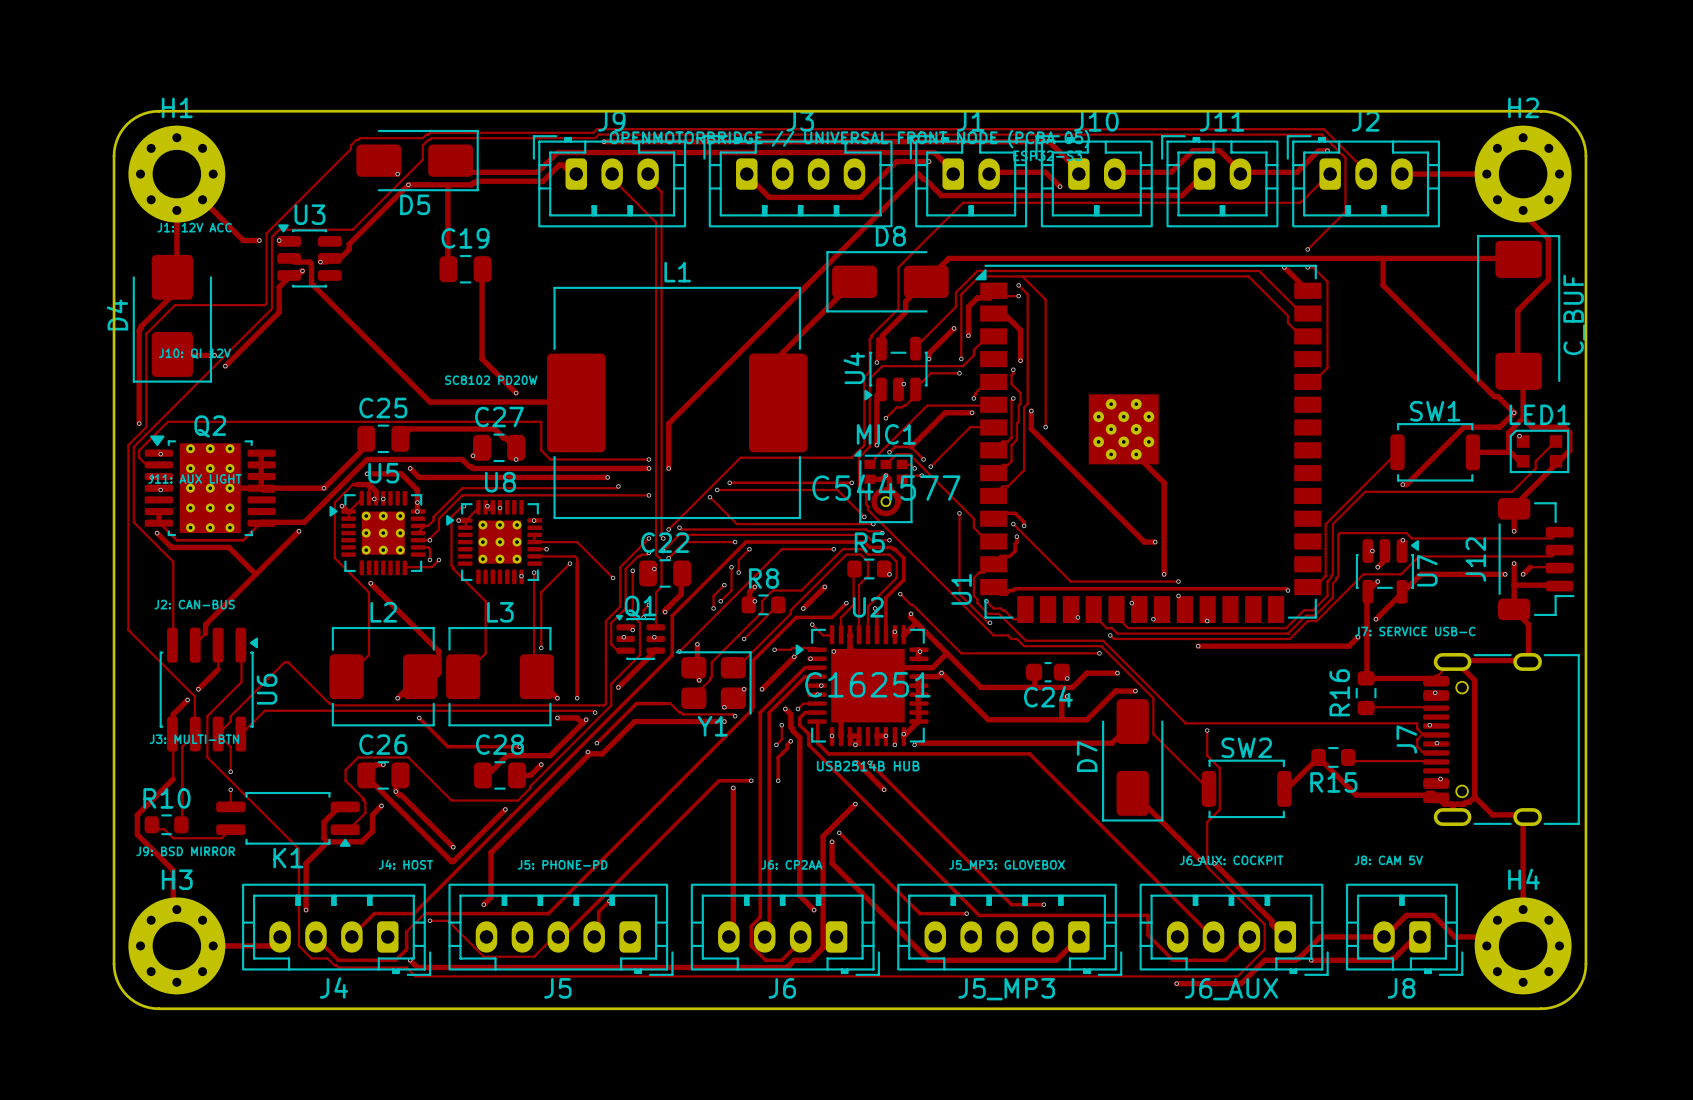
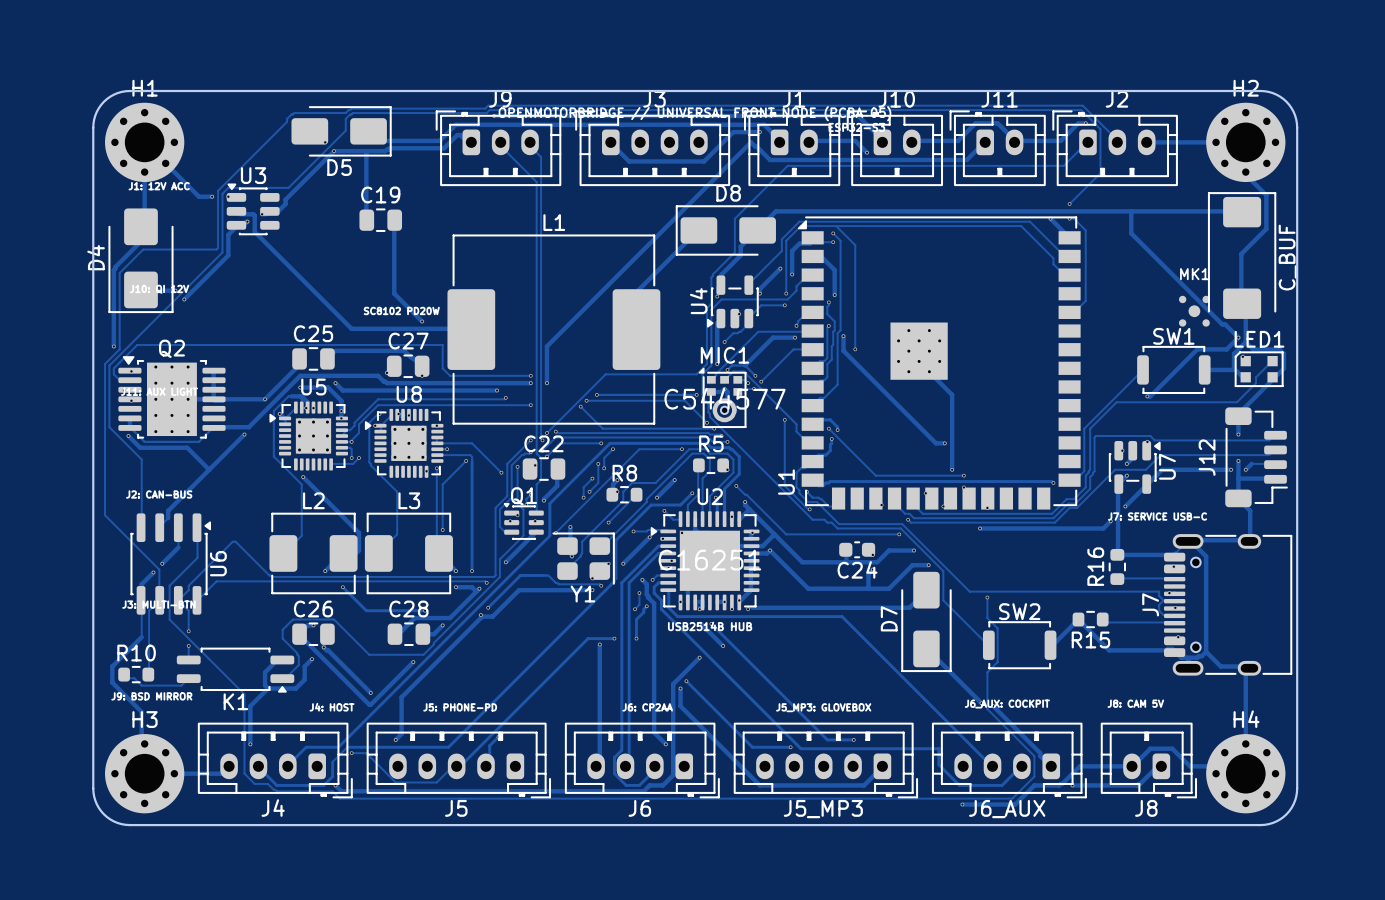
MK1: none -> (1194, 311)

